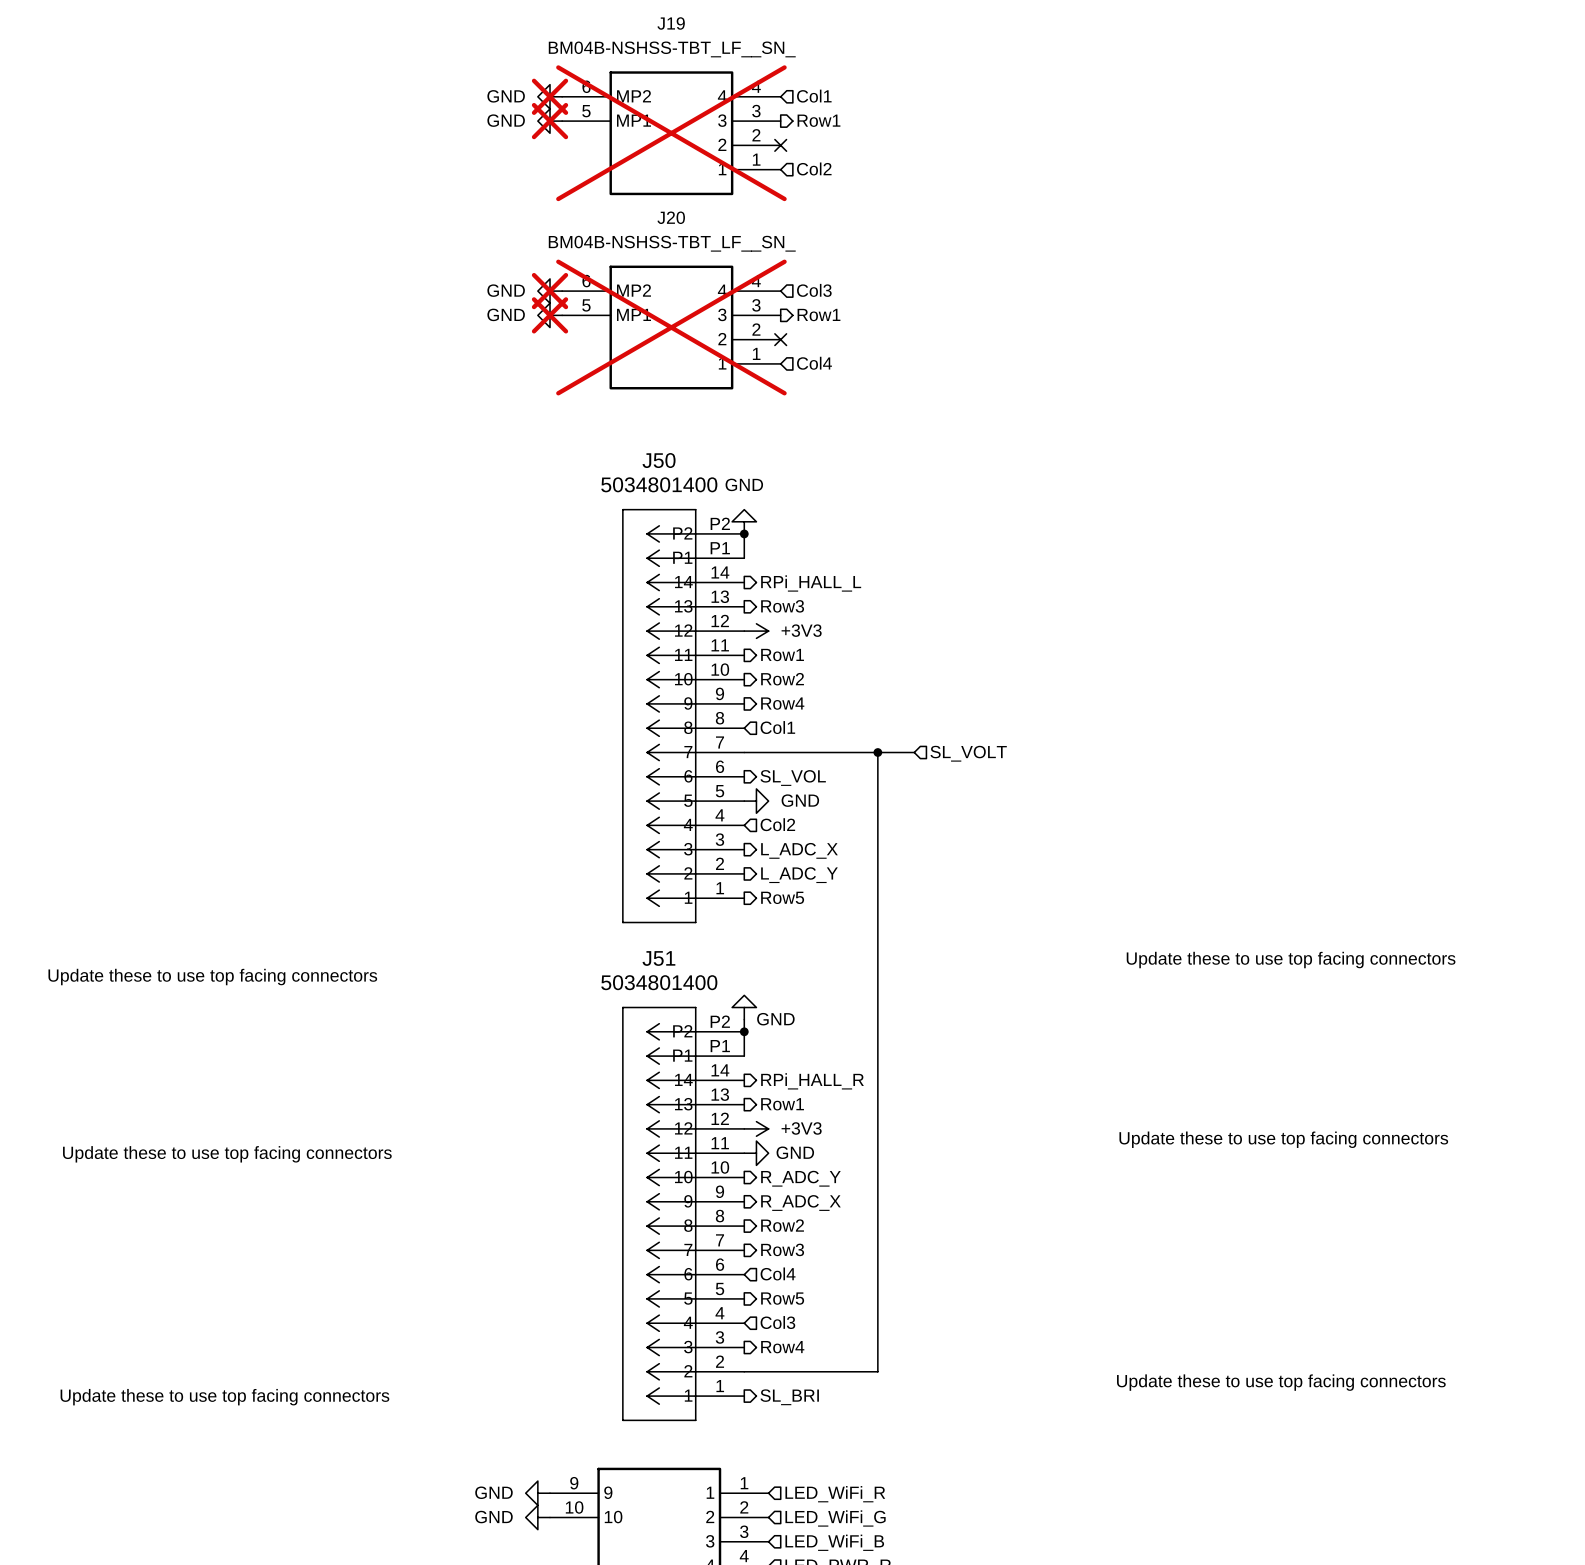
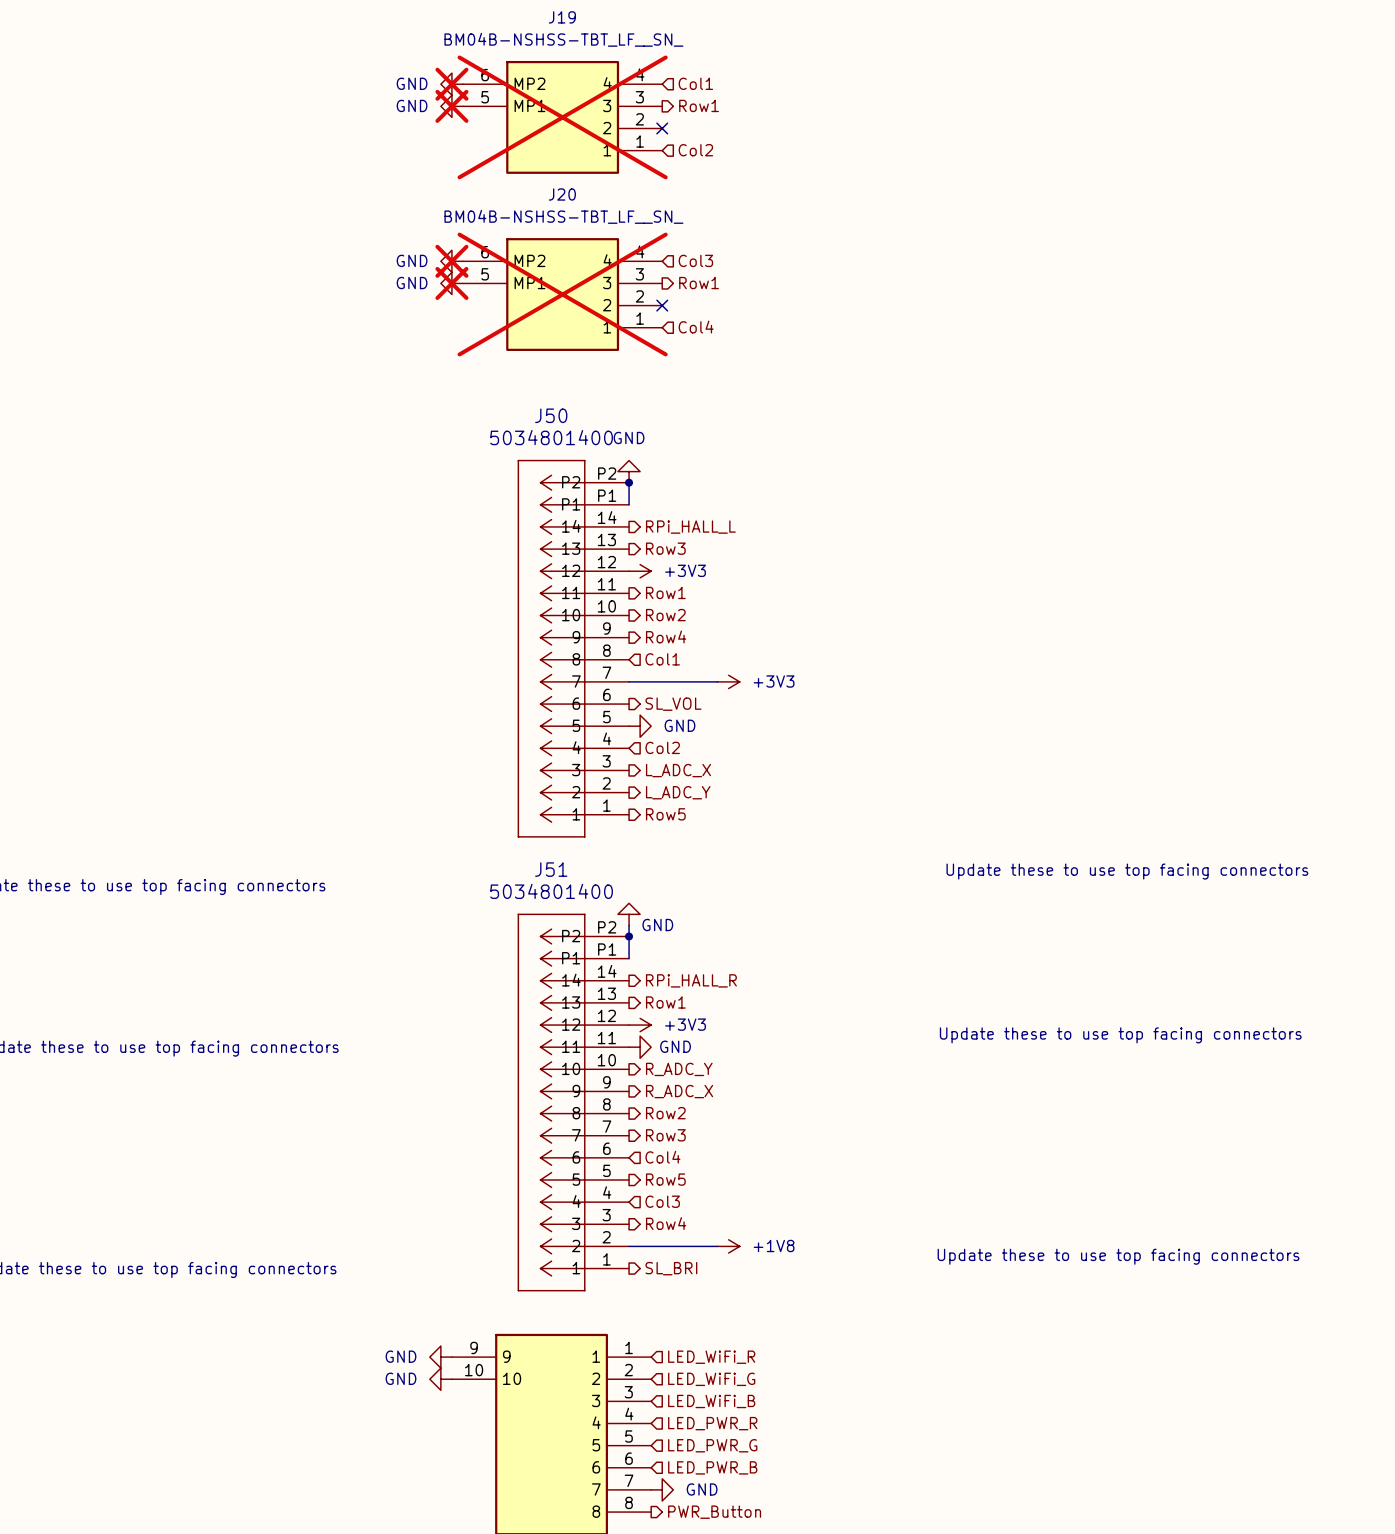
power symbol: none -> +3V3 (728, 681)
wire: (877, 752) (877, 1371) (841, 1371) -> none
junction: (877, 752) -> none
hierarchical label: SL_VOLT (968, 753) -> none
power symbol: none -> +1V8 (728, 1246)

